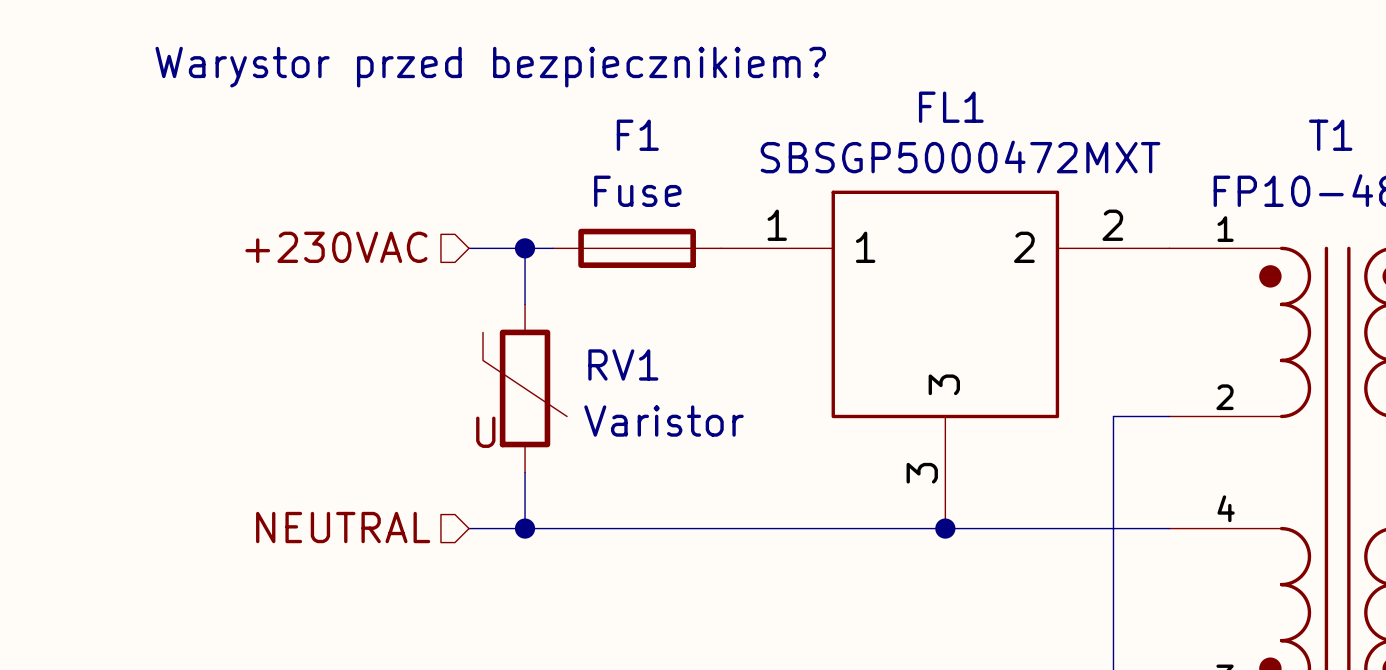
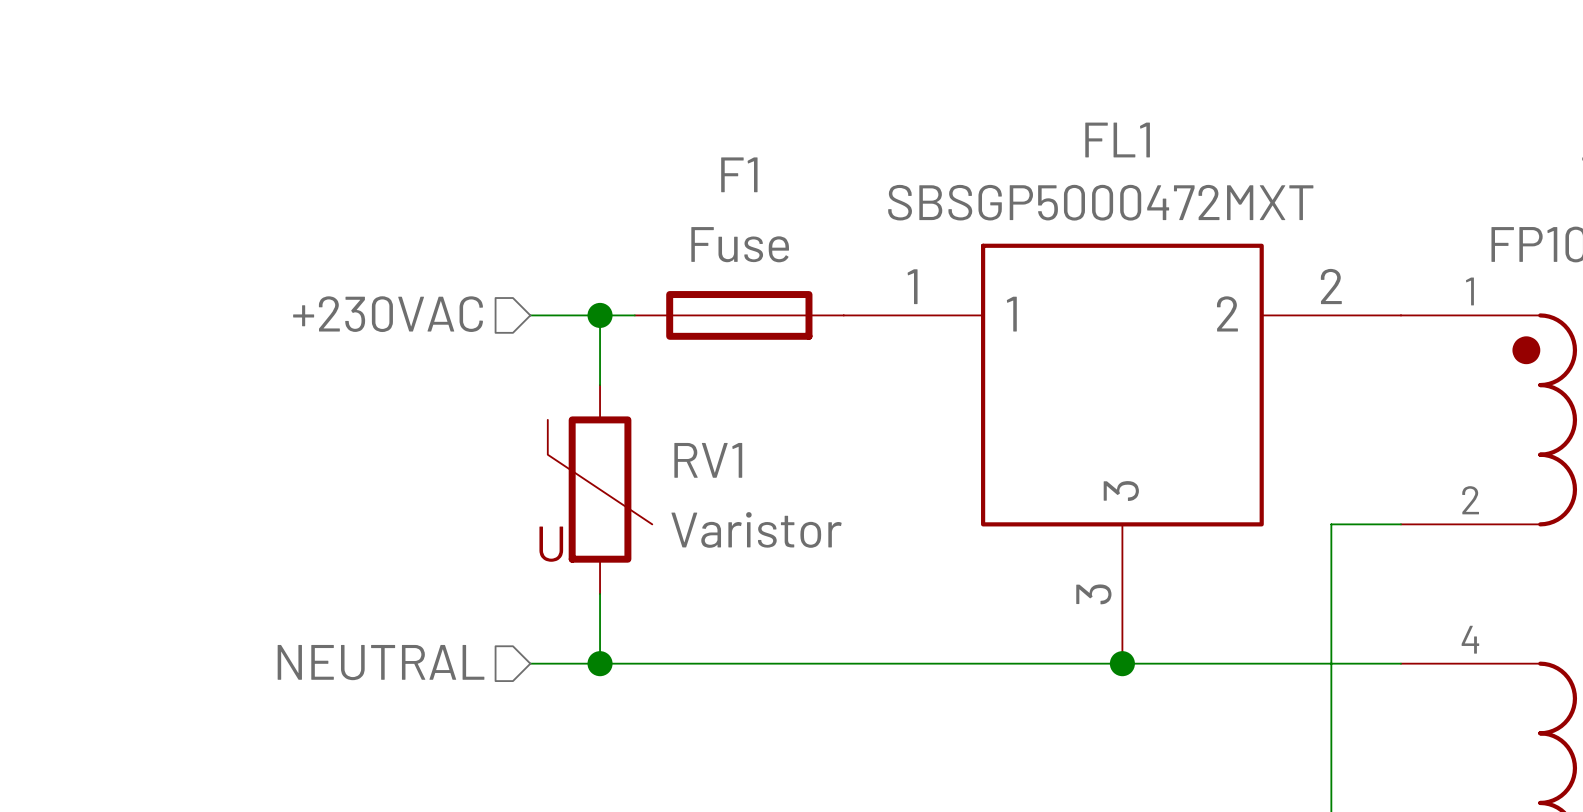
text: Warystor przed bezpiecznikiem? (490, 67) -> none

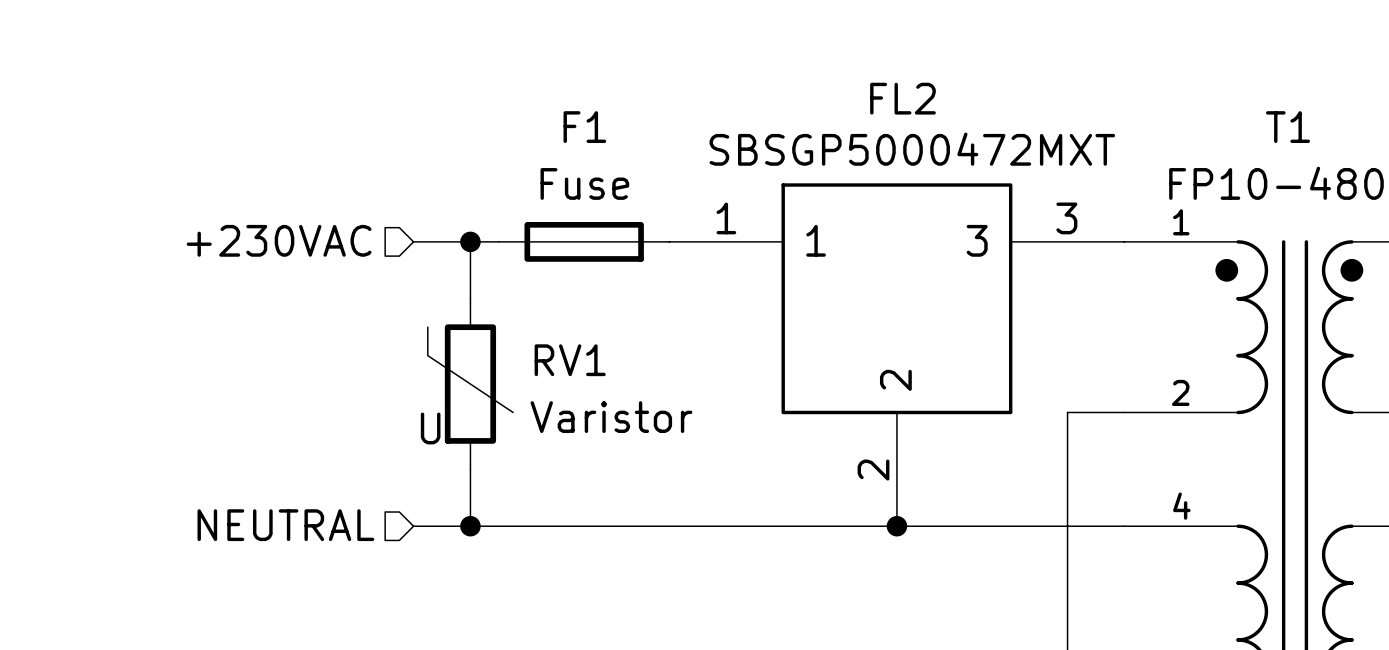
FL1 name: FL1 (1117, 140) -> FL2 (902, 98)
FL1 pin number: 2 (1331, 286) -> 3 (1066, 218)
FL1 pin name: 2 (1227, 313) -> 3 (977, 240)
FL1 pin name: 3 (1121, 491) -> 2 (895, 380)
FL1 pin number: 3 (1093, 594) -> 2 (873, 470)

